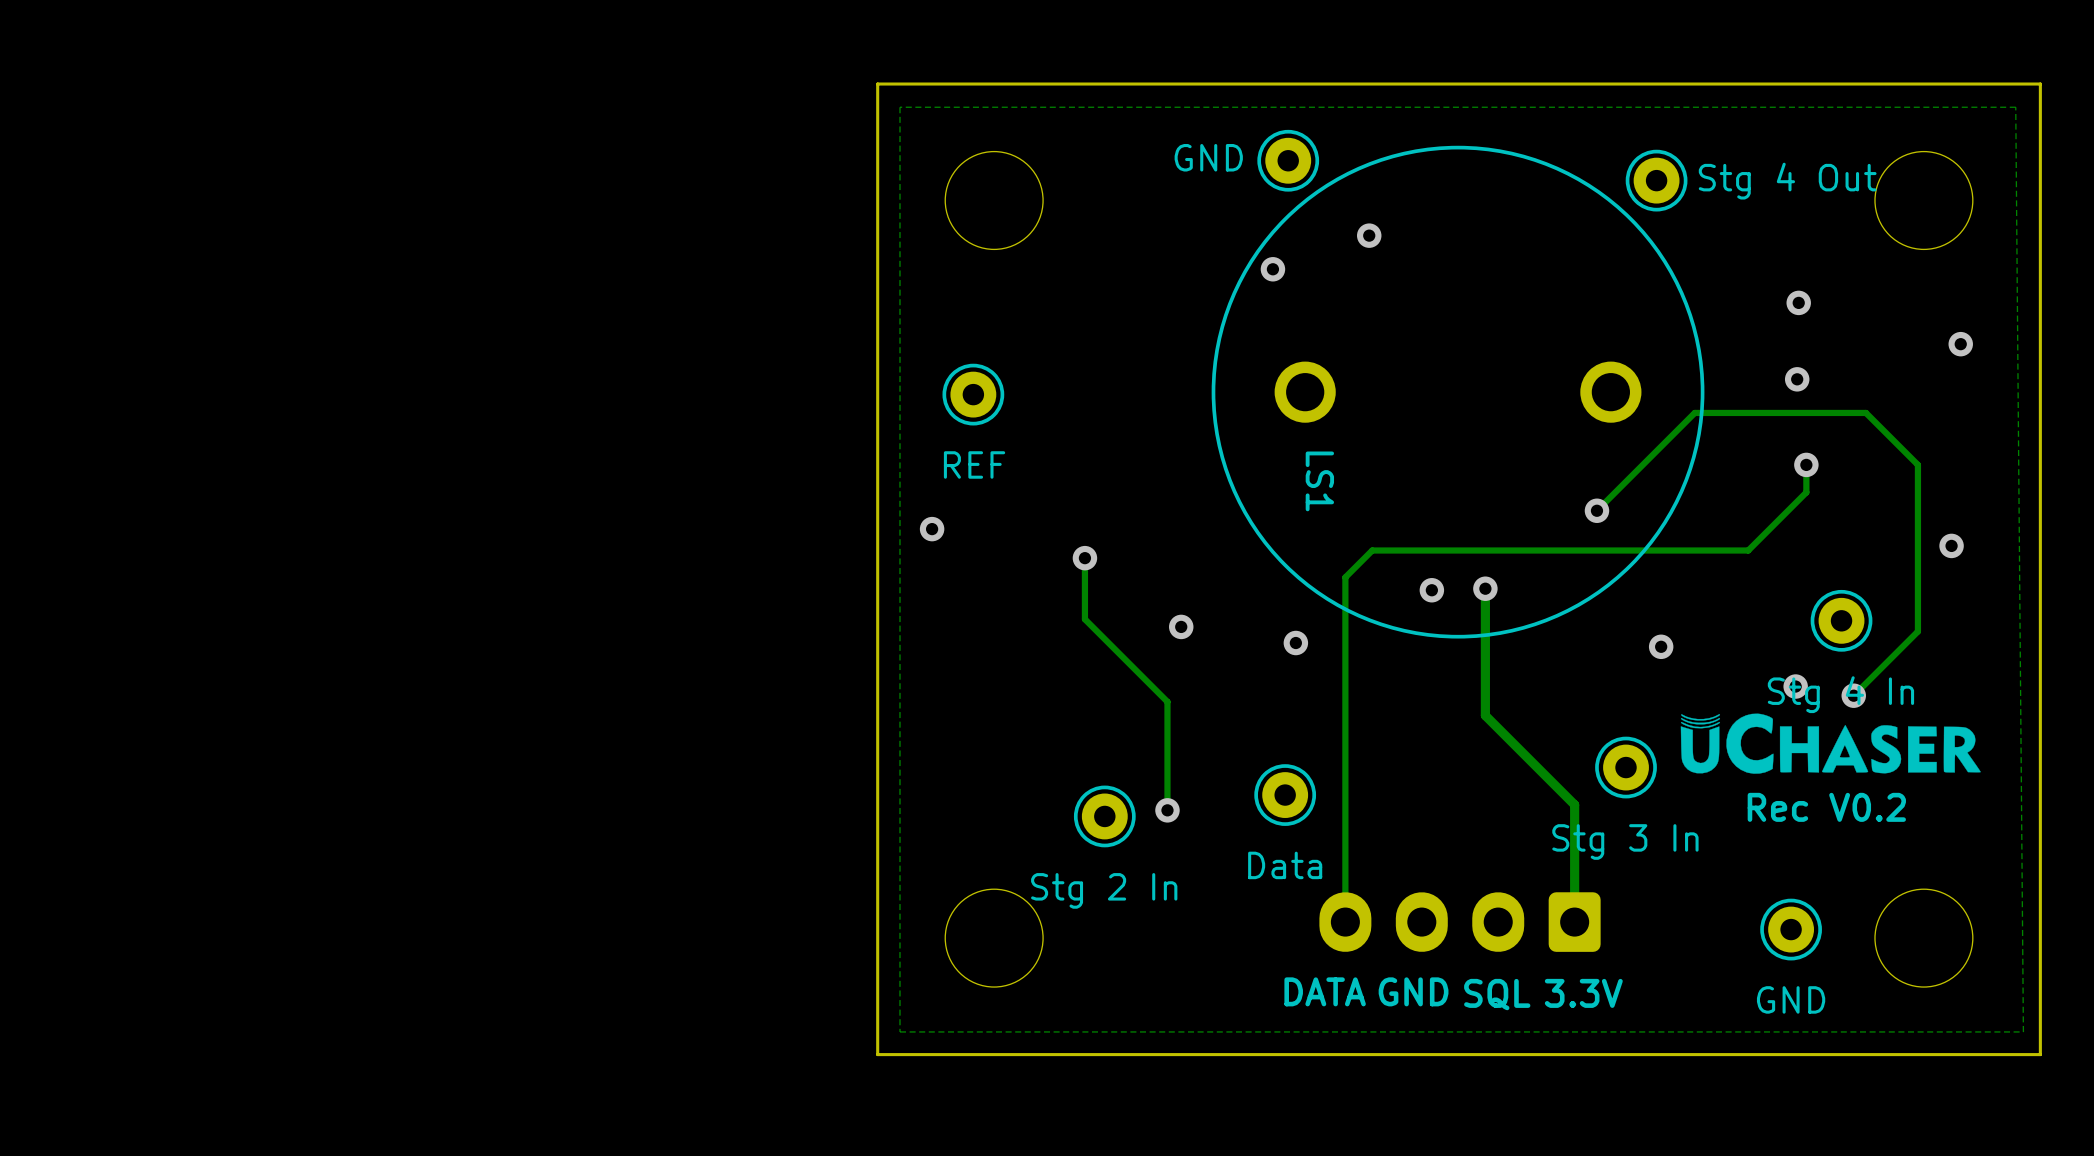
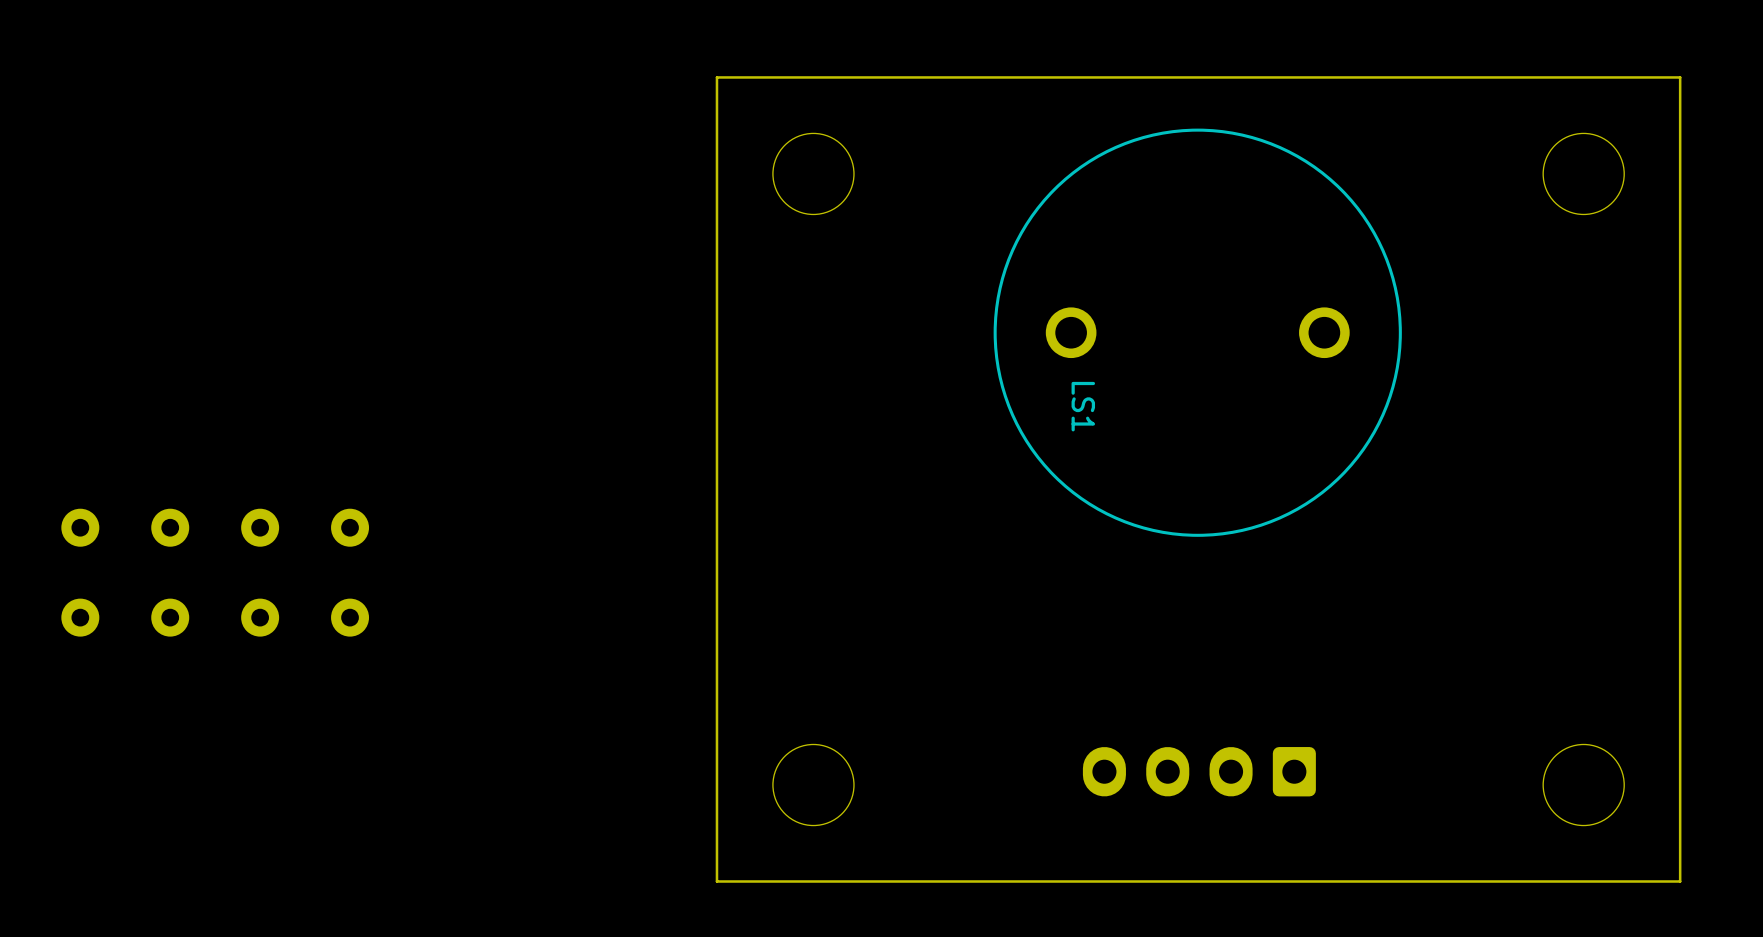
zone outline: (2015, 107) (900, 107) (900, 1031) (2023, 1031) (2015, 107) -> none
part: (1288, 160) -> none
part: (1656, 180) -> none
via: (1369, 235) -> none
via: (1272, 269) -> none
via: (1798, 302) -> none
via: (1960, 344) -> none
via: (1797, 379) -> none
part side: bottom (973, 394) -> top (260, 617)
track: (1806, 464) (1806, 492) (1748, 550) (1372, 550) (1345, 577) (1345, 922) -> none
via: (1806, 464) -> none
track: (1596, 510) (1694, 412) (1865, 412) (1917, 464) (1917, 631) (1853, 695) -> none
via: (1596, 510) -> none
via: (932, 529) -> none
via: (1951, 545) -> none
track: (1084, 558) (1084, 619) (1167, 701) (1167, 810) -> none
via: (1084, 558) -> none
track: (1485, 588) (1485, 715) (1574, 804) (1574, 922) -> none
via: (1485, 588) -> none
via: (1431, 590) -> none
part: (1841, 620) -> none
via: (1181, 626) -> none
part: none -> (80, 527)
part: none -> (170, 527)
part: none -> (260, 527)
part: none -> (350, 527)
via: (1295, 643) -> none
via: (1661, 646) -> none
via: (1795, 686) -> none
via: (1853, 695) -> none
drawing: [1680, 713, 1981, 774] -> none
part: none -> (80, 617)
part: none -> (170, 617)
part: none -> (350, 617)
part: (1626, 767) -> none
part: (1285, 795) -> none
text: Rec V0.2 (1826, 807) -> none
via: (1167, 810) -> none
part: (1104, 816) -> none
part: (1791, 929) -> none
text: DATA (1325, 991) -> none
text: GND (1413, 991) -> none
text: 3.3V (1583, 993) -> none
text: SQL (1497, 994) -> none

